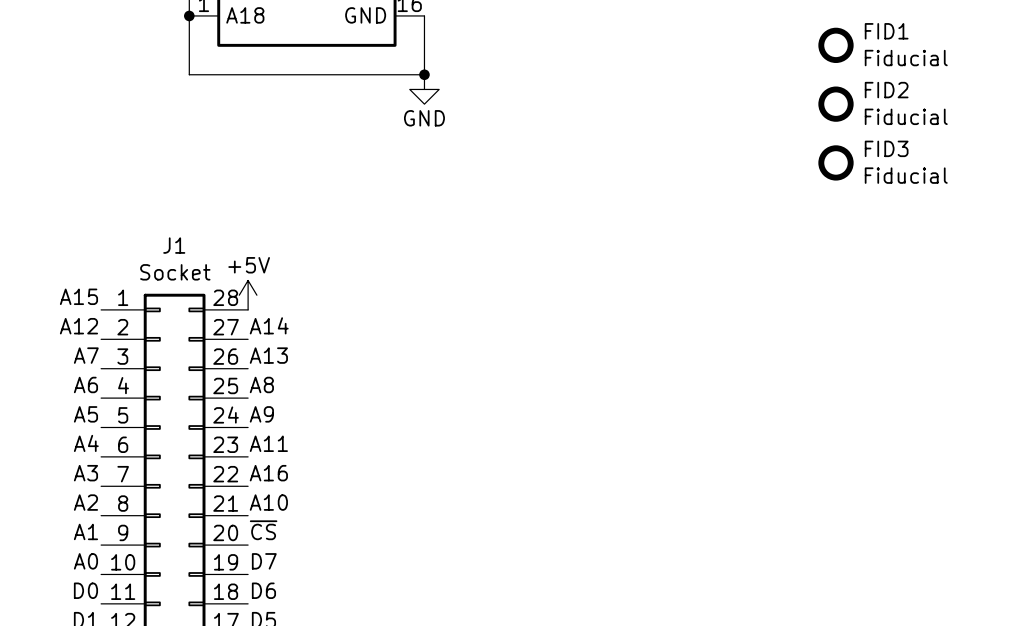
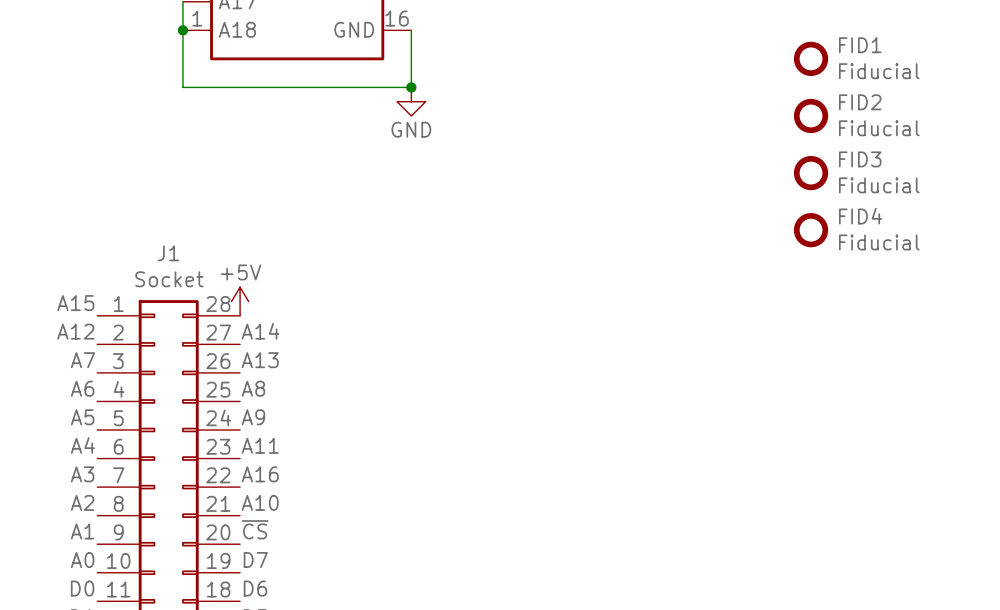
FID4: none -> Fiducial (811, 230)

